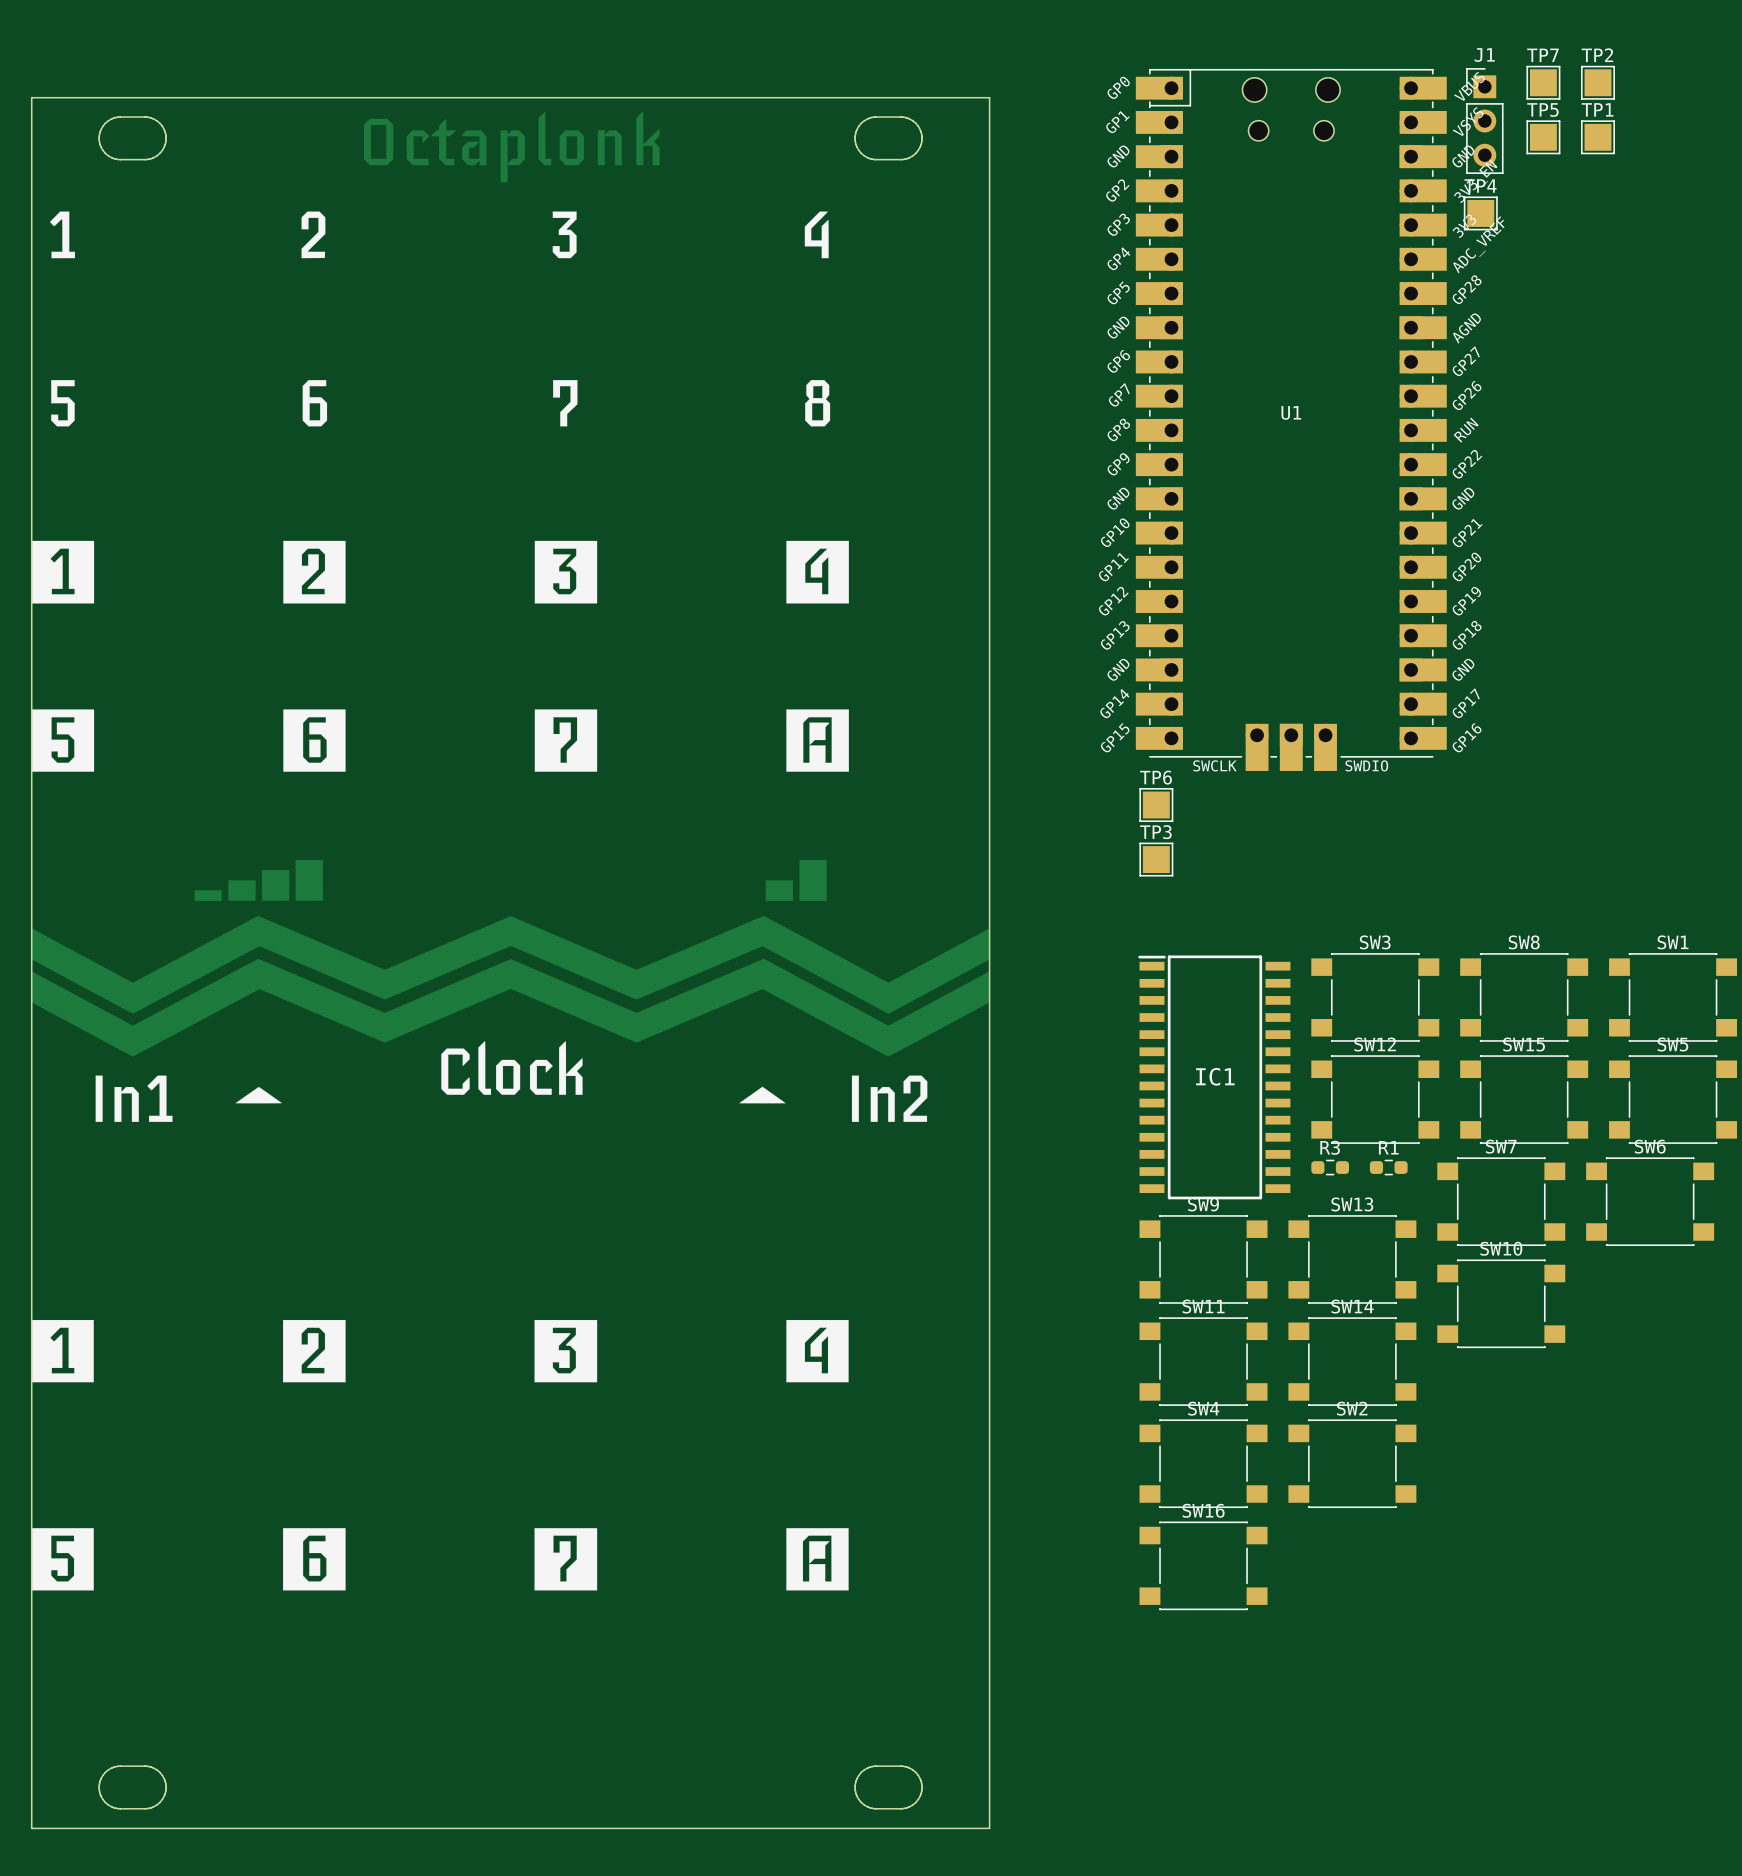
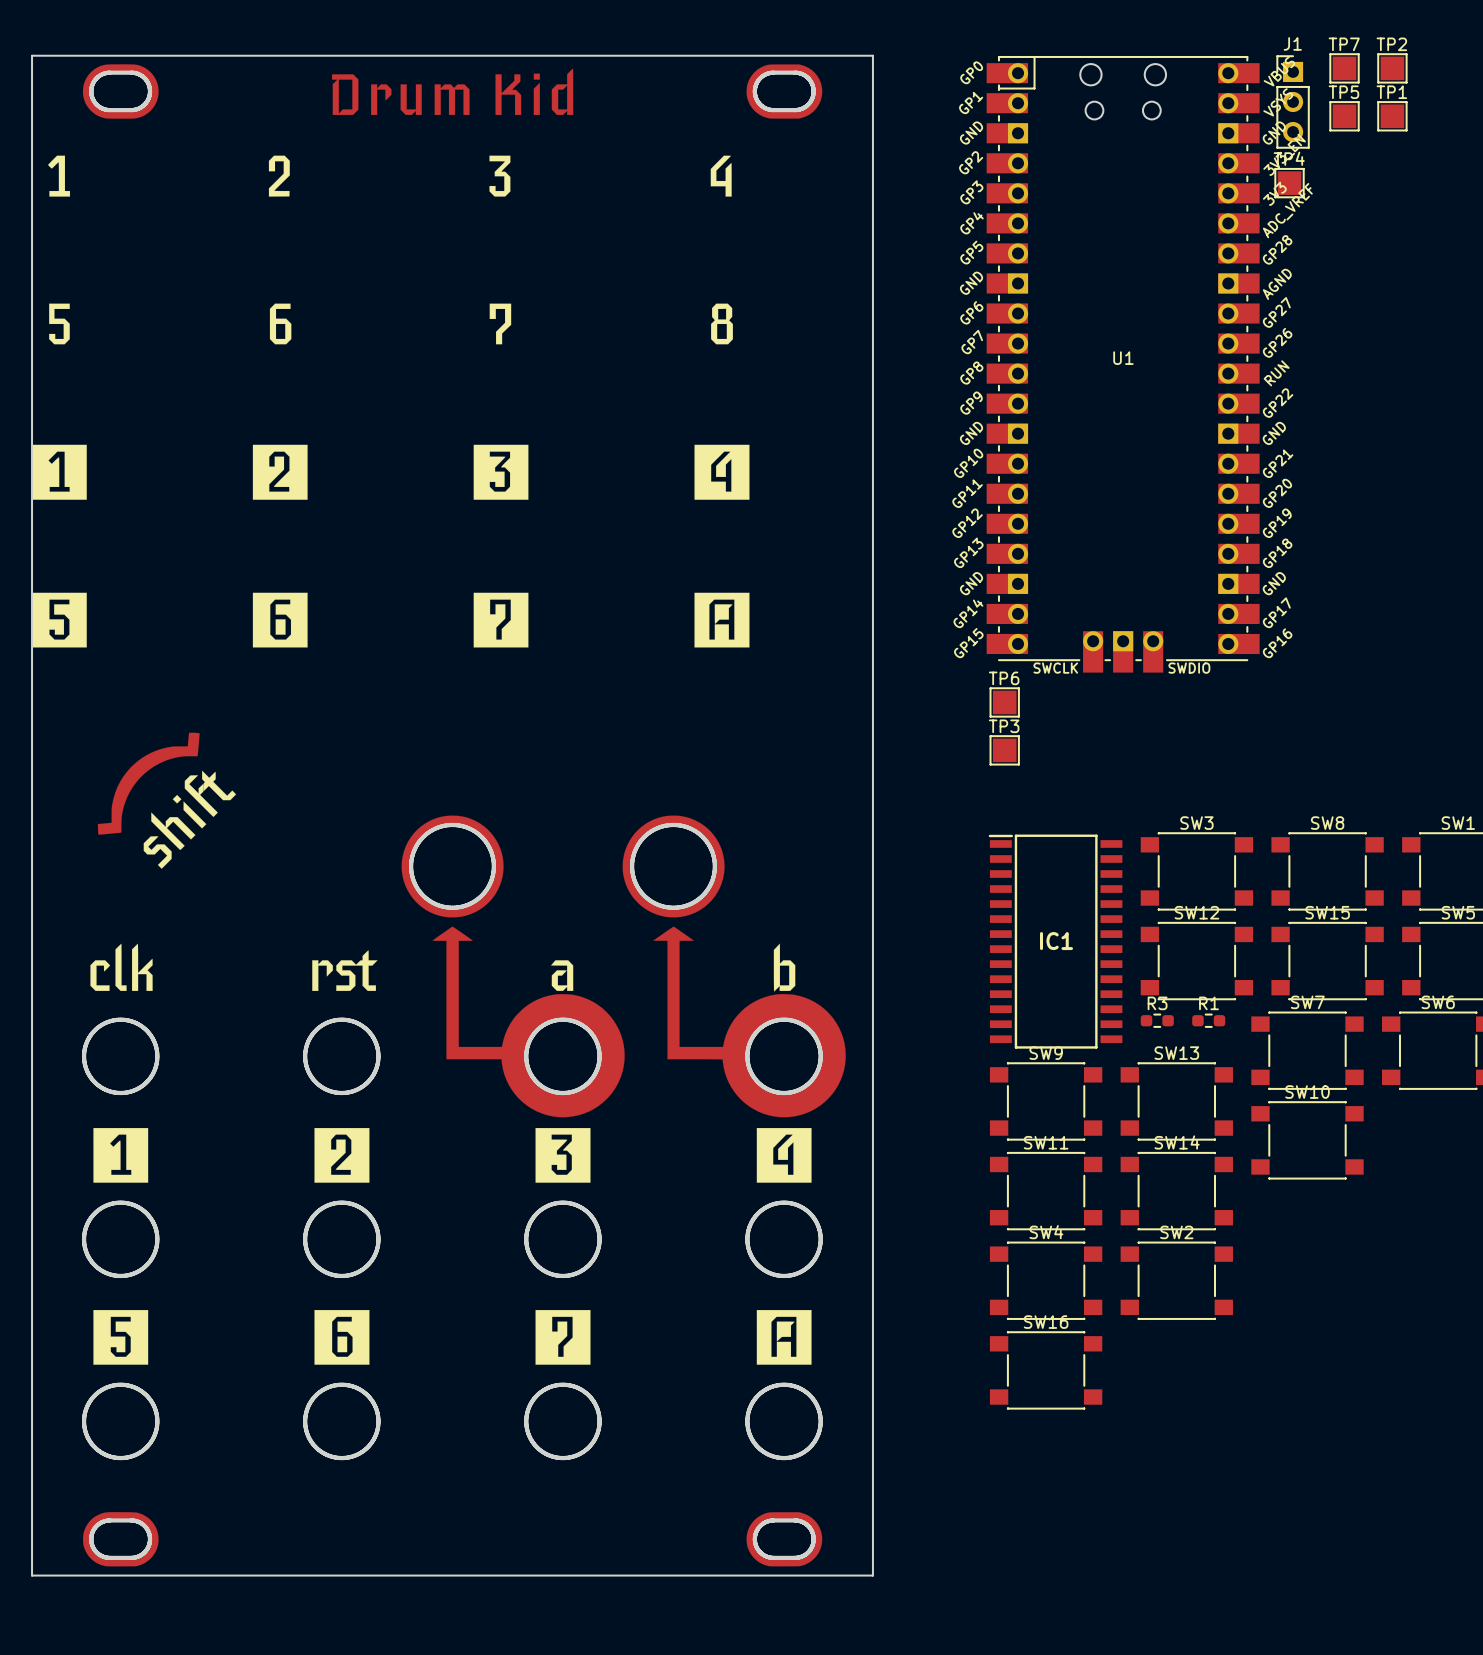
drawing: none -> [31, 55, 874, 1577]
drawing: [31, 97, 991, 1830] -> none

